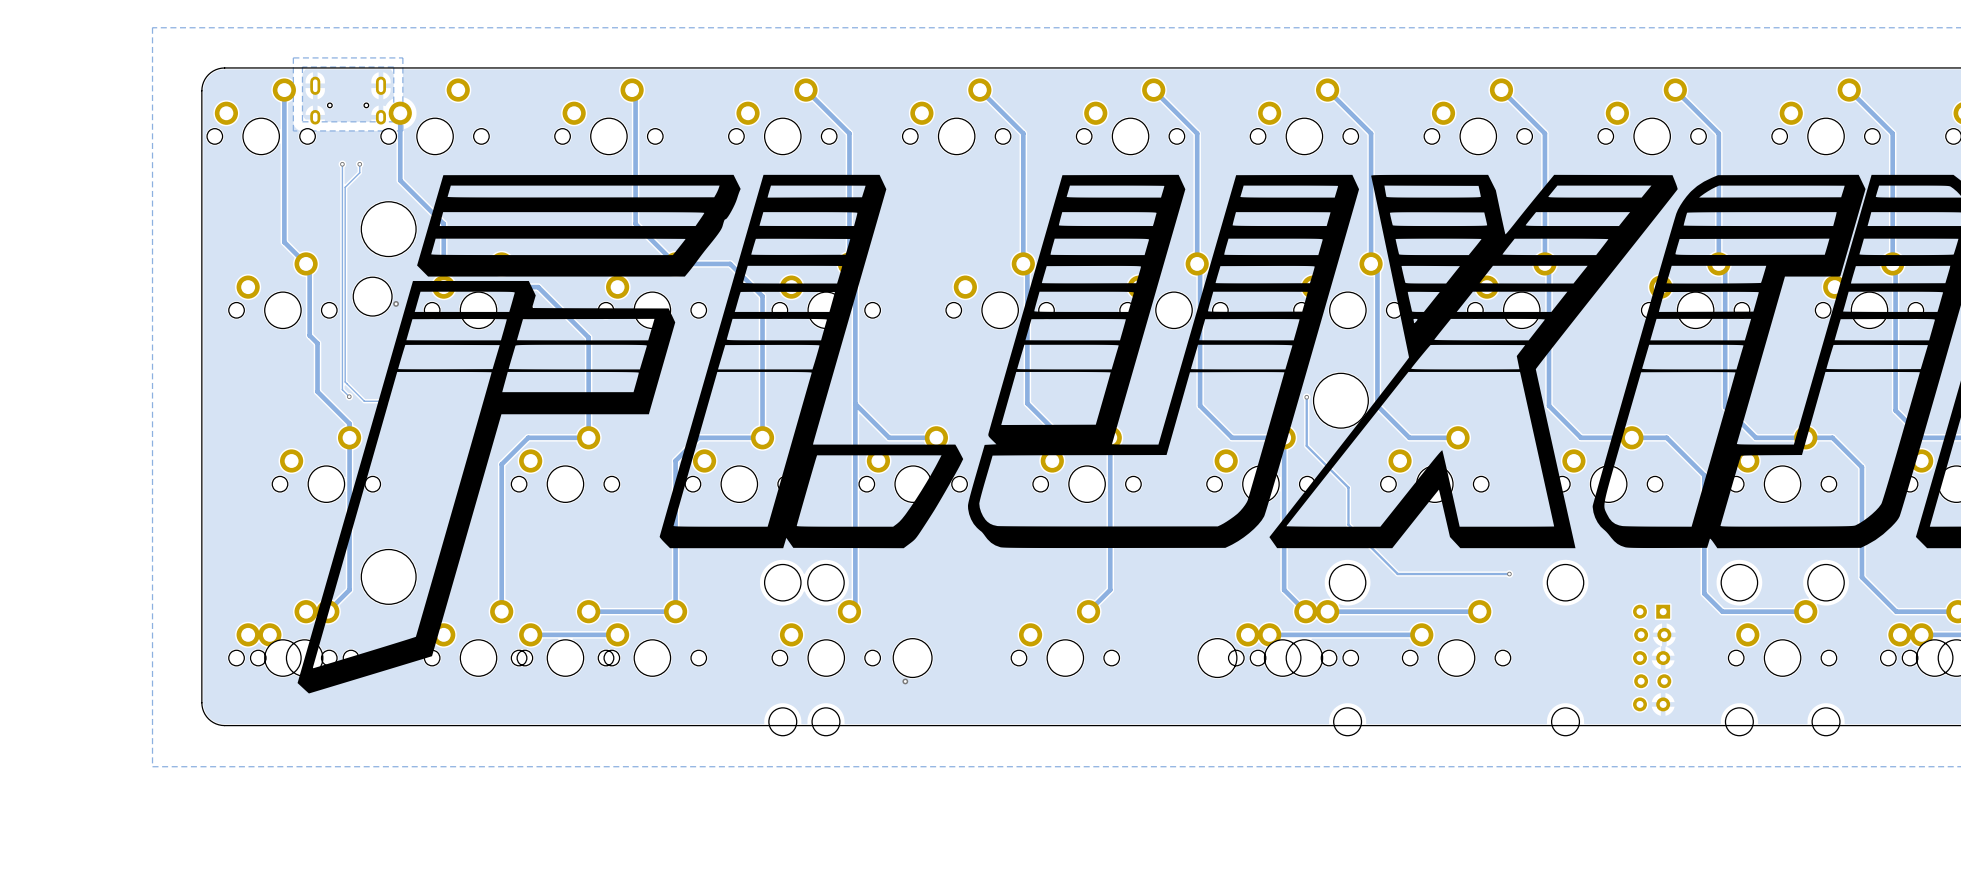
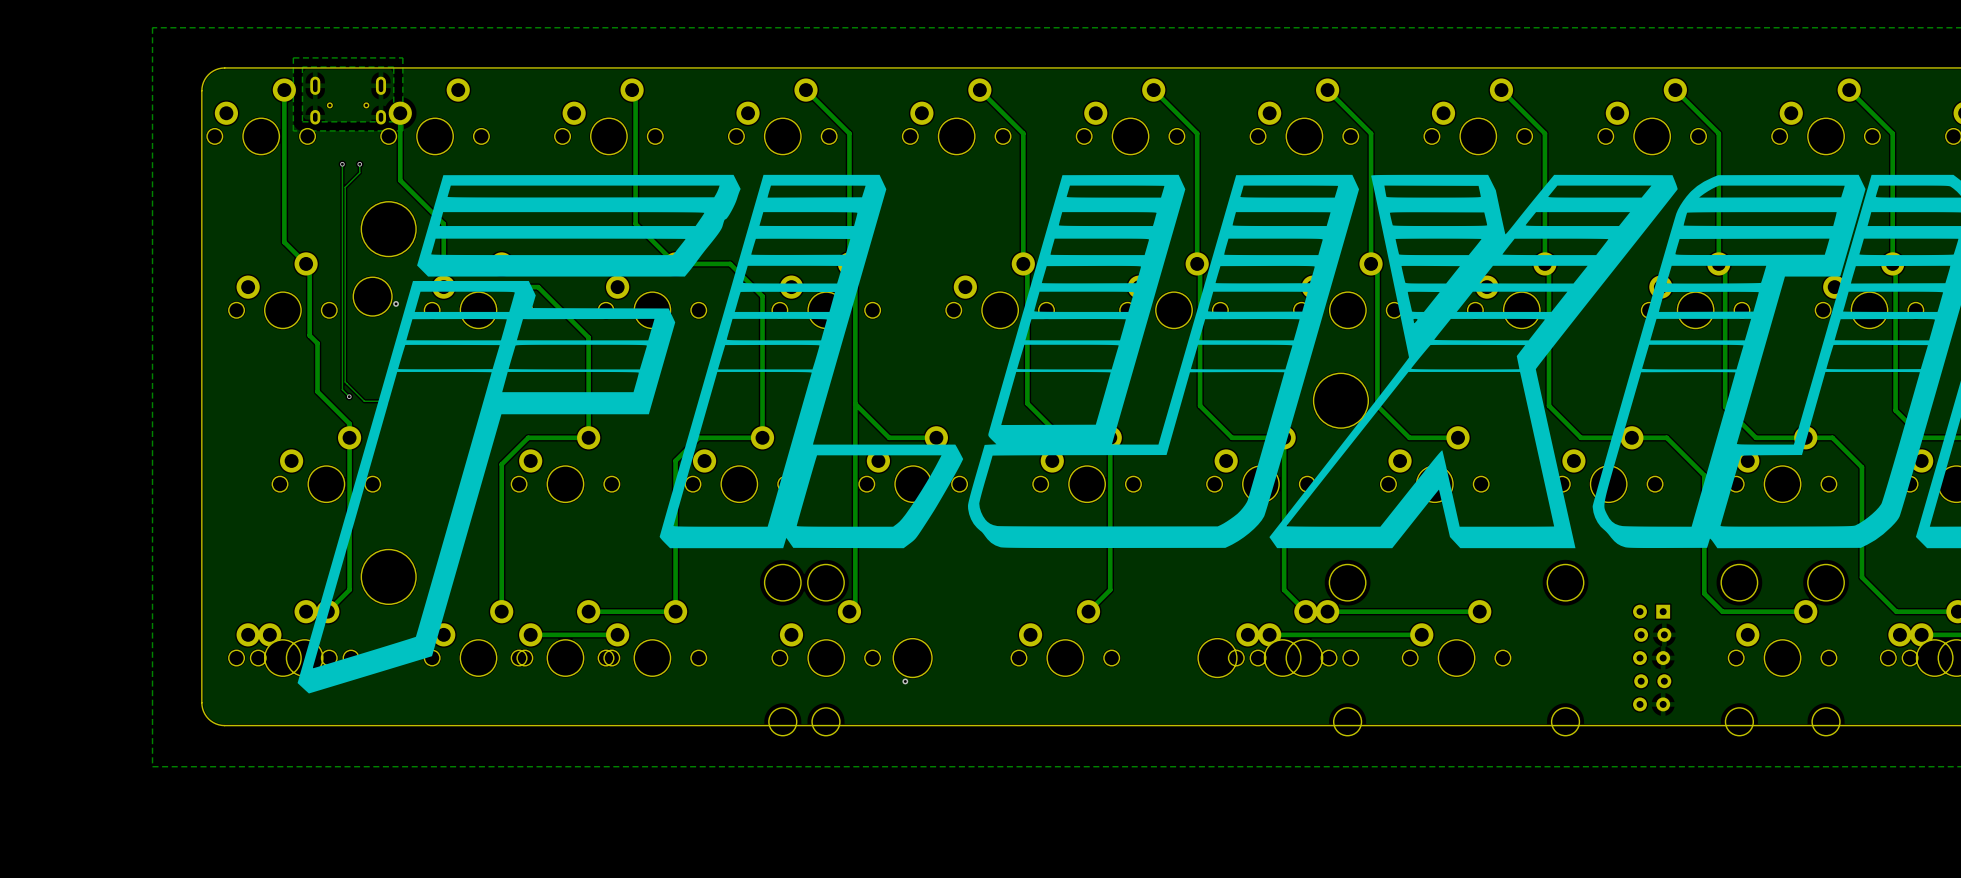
track: (1306, 397) (1306, 445) (1348, 487) (1348, 524) (1397, 574) (1509, 574) -> none
via: (1306, 397) -> none
via: (1509, 574) -> none

